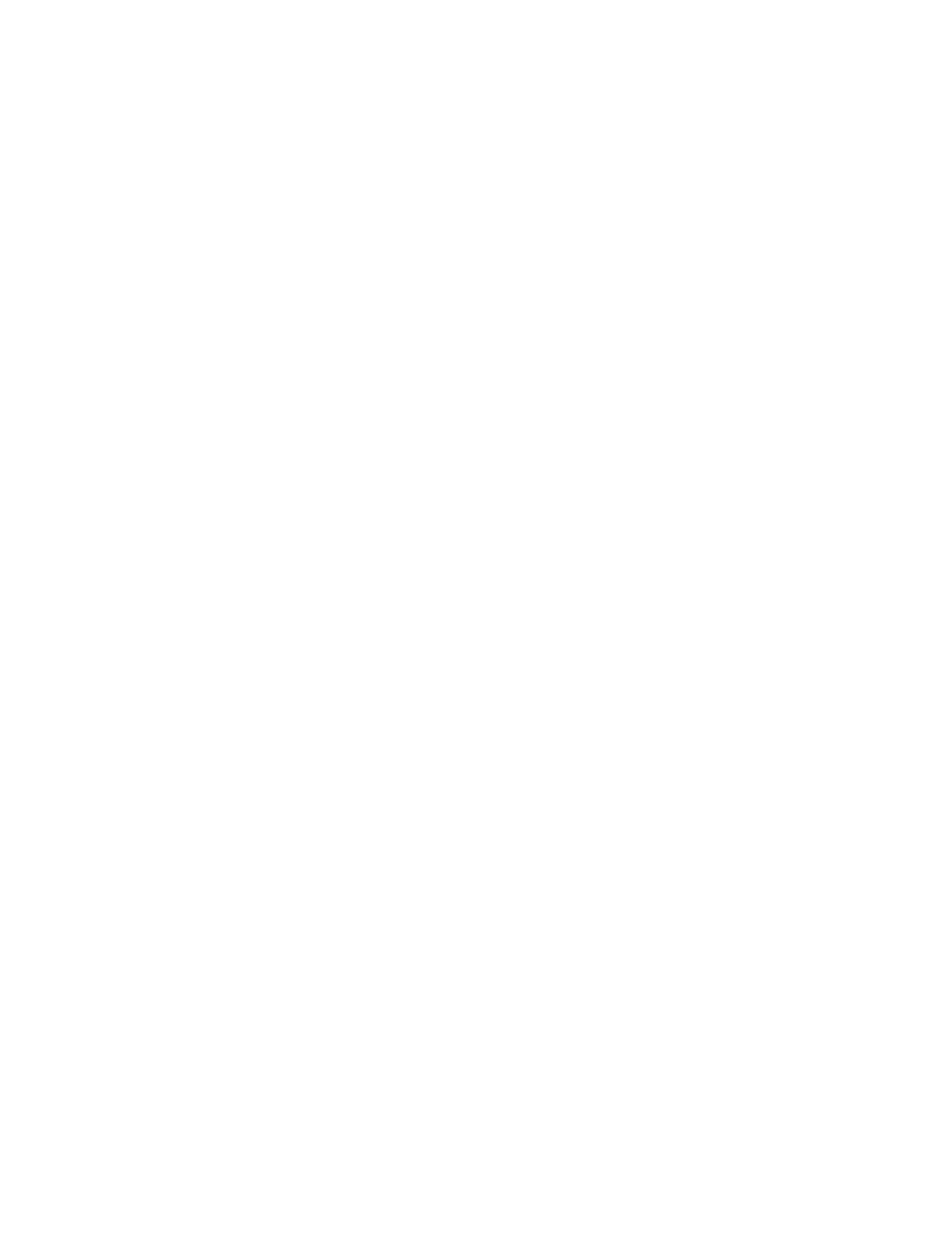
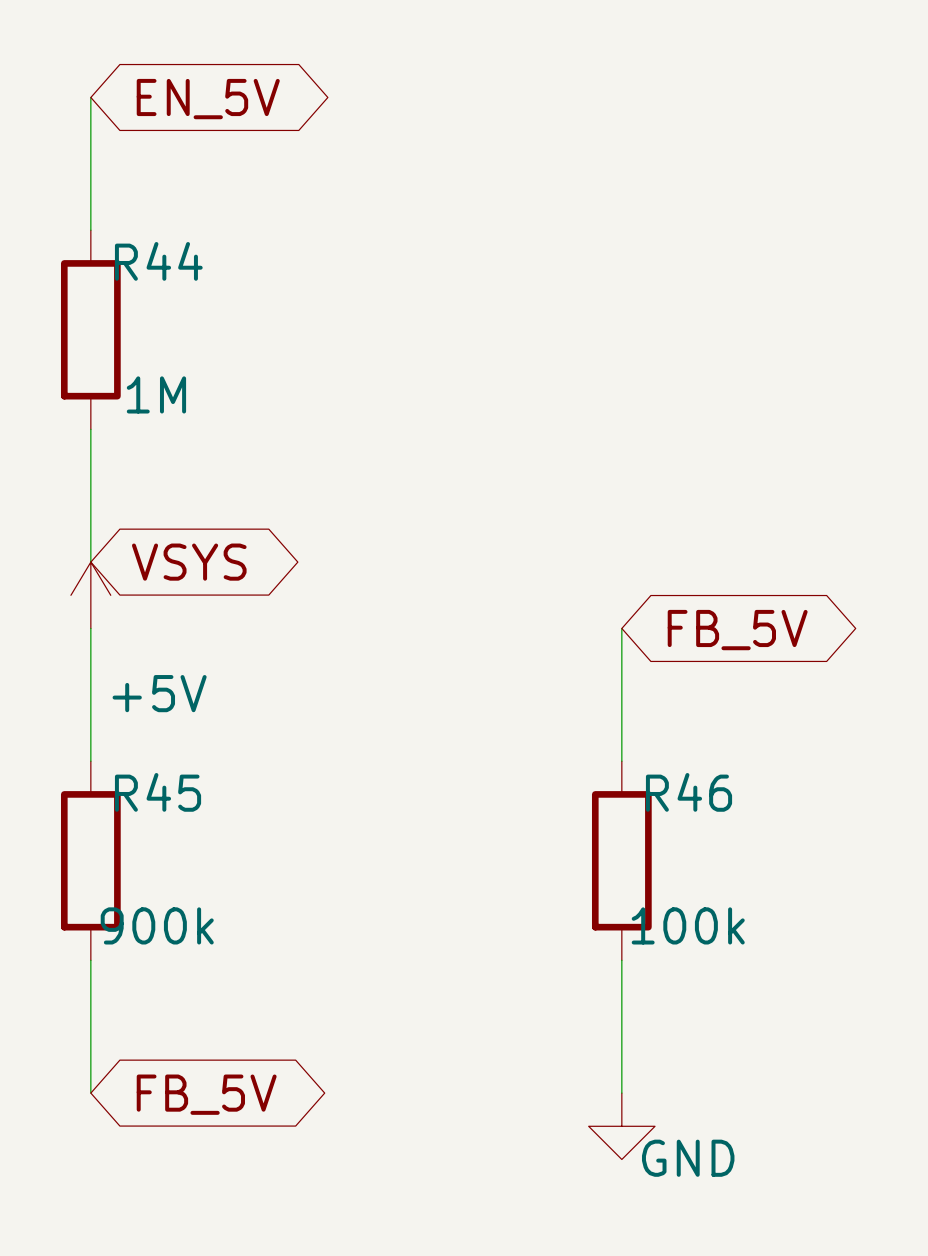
wire: none -> (90, 97) (90, 230)
global label: none -> EN_5V (208, 99)
R44: none -> 1M (90, 329)
wire: none -> (90, 429) (90, 562)
global label: none -> VSYS (189, 562)
power symbol: none -> +5V (90, 595)
wire: none -> (90, 628) (90, 761)
wire: none -> (621, 628) (621, 761)
global label: none -> FB_5V (737, 630)
R45: none -> 900k (90, 860)
R46: none -> 100k (621, 860)
wire: none -> (90, 960) (90, 1093)
wire: none -> (621, 960) (621, 1093)
global label: none -> FB_5V (206, 1094)
power symbol: none -> GND (621, 1126)

